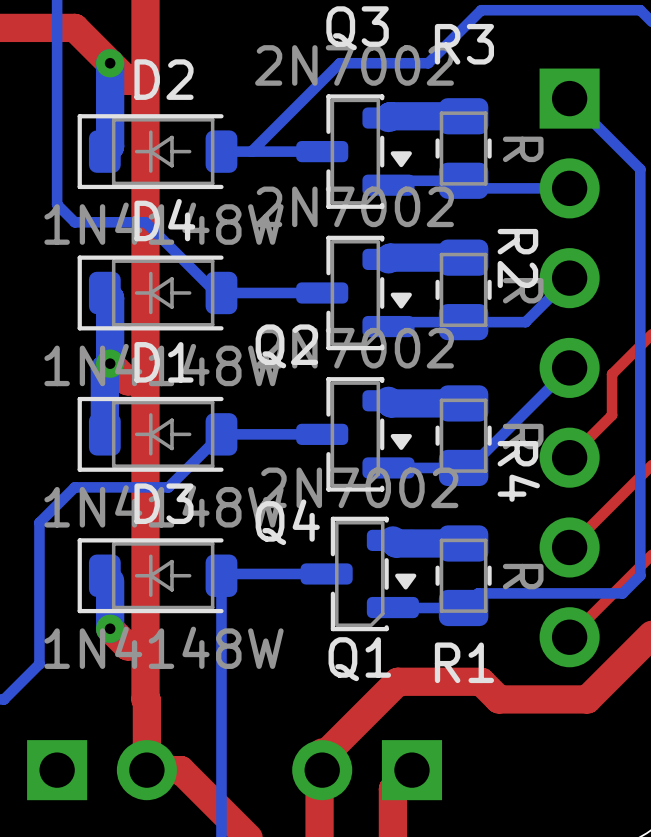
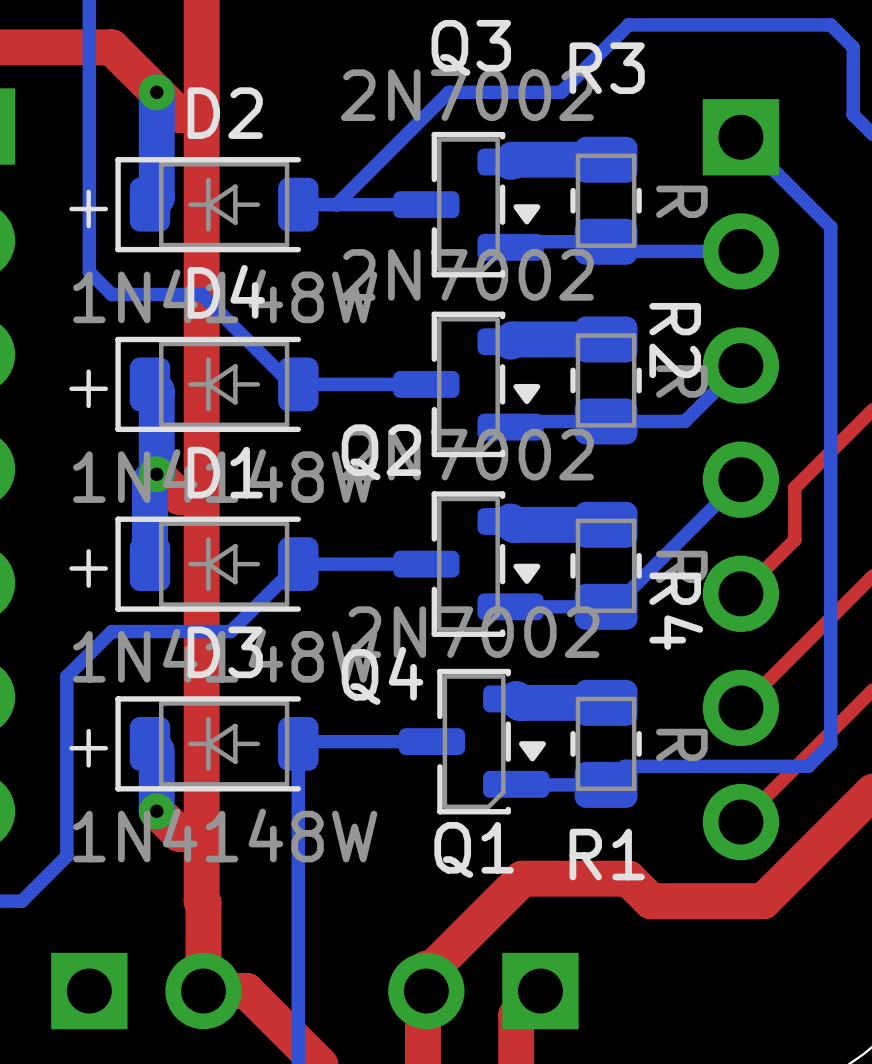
text: none -> + (88, 209)
text: none -> + (88, 388)
text: none -> + (88, 568)
text: none -> + (88, 748)

